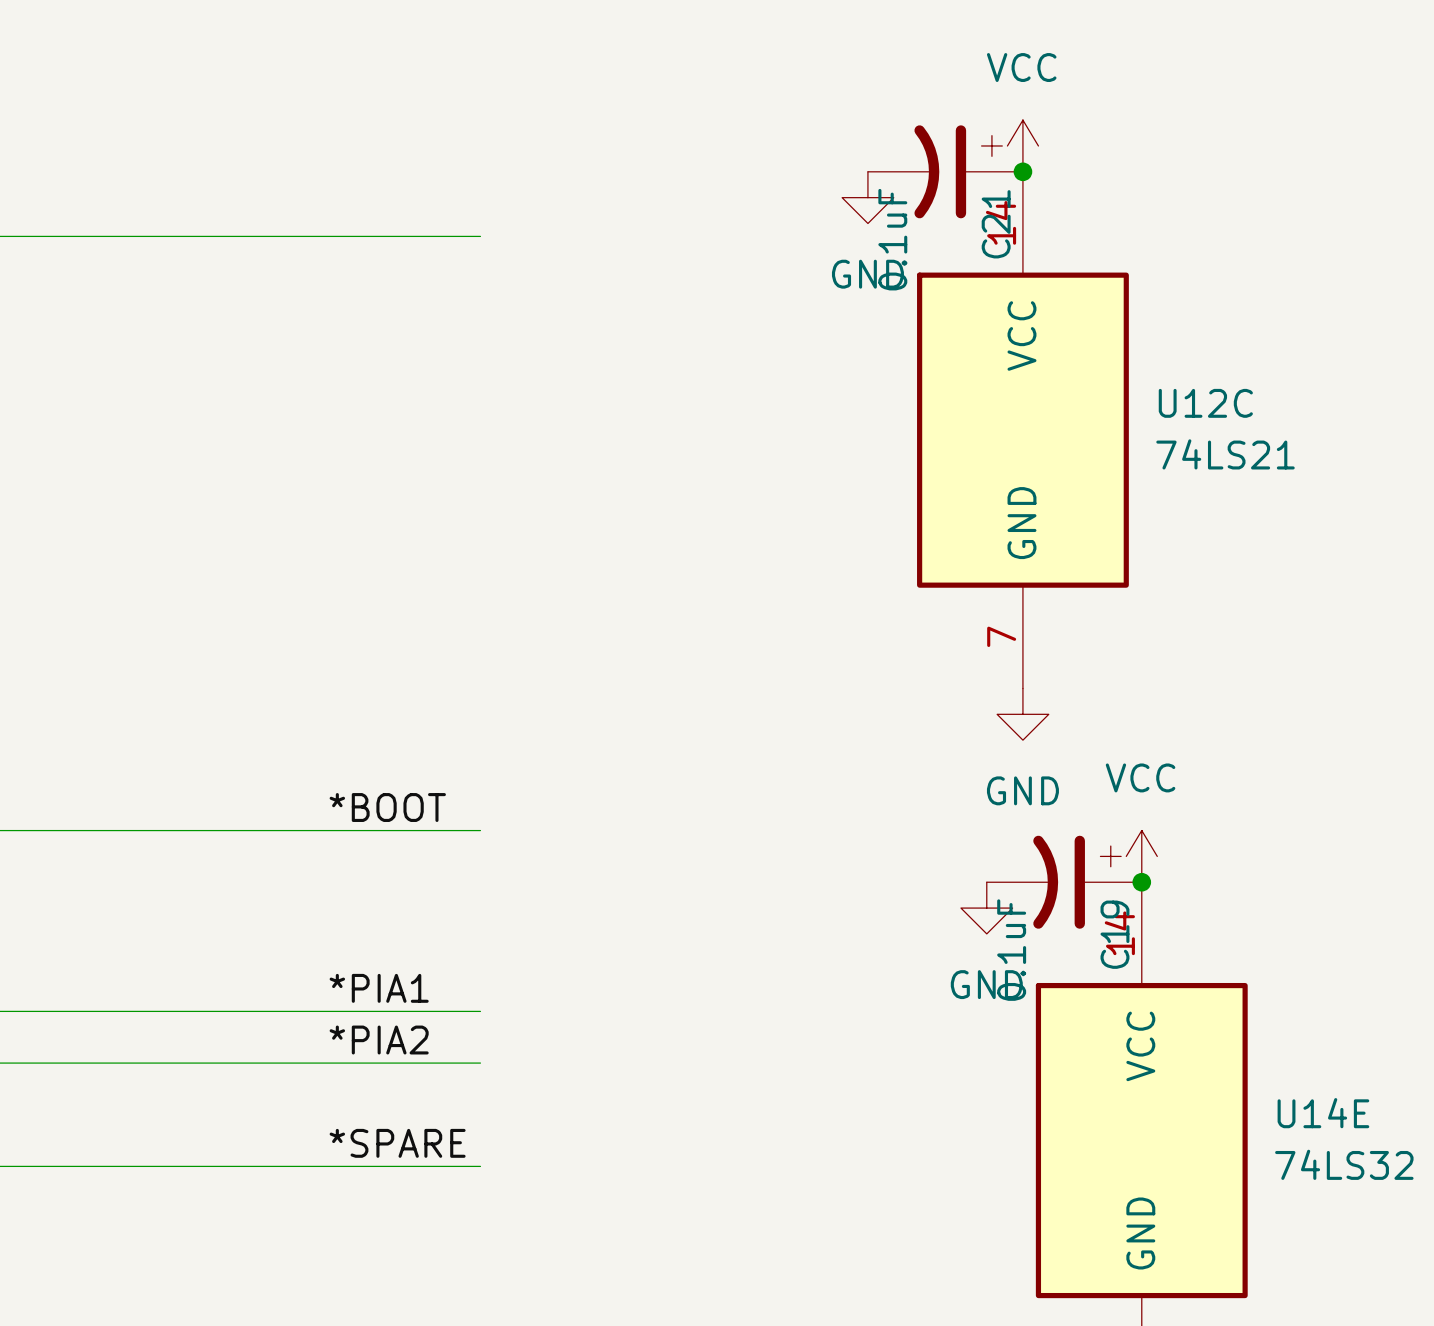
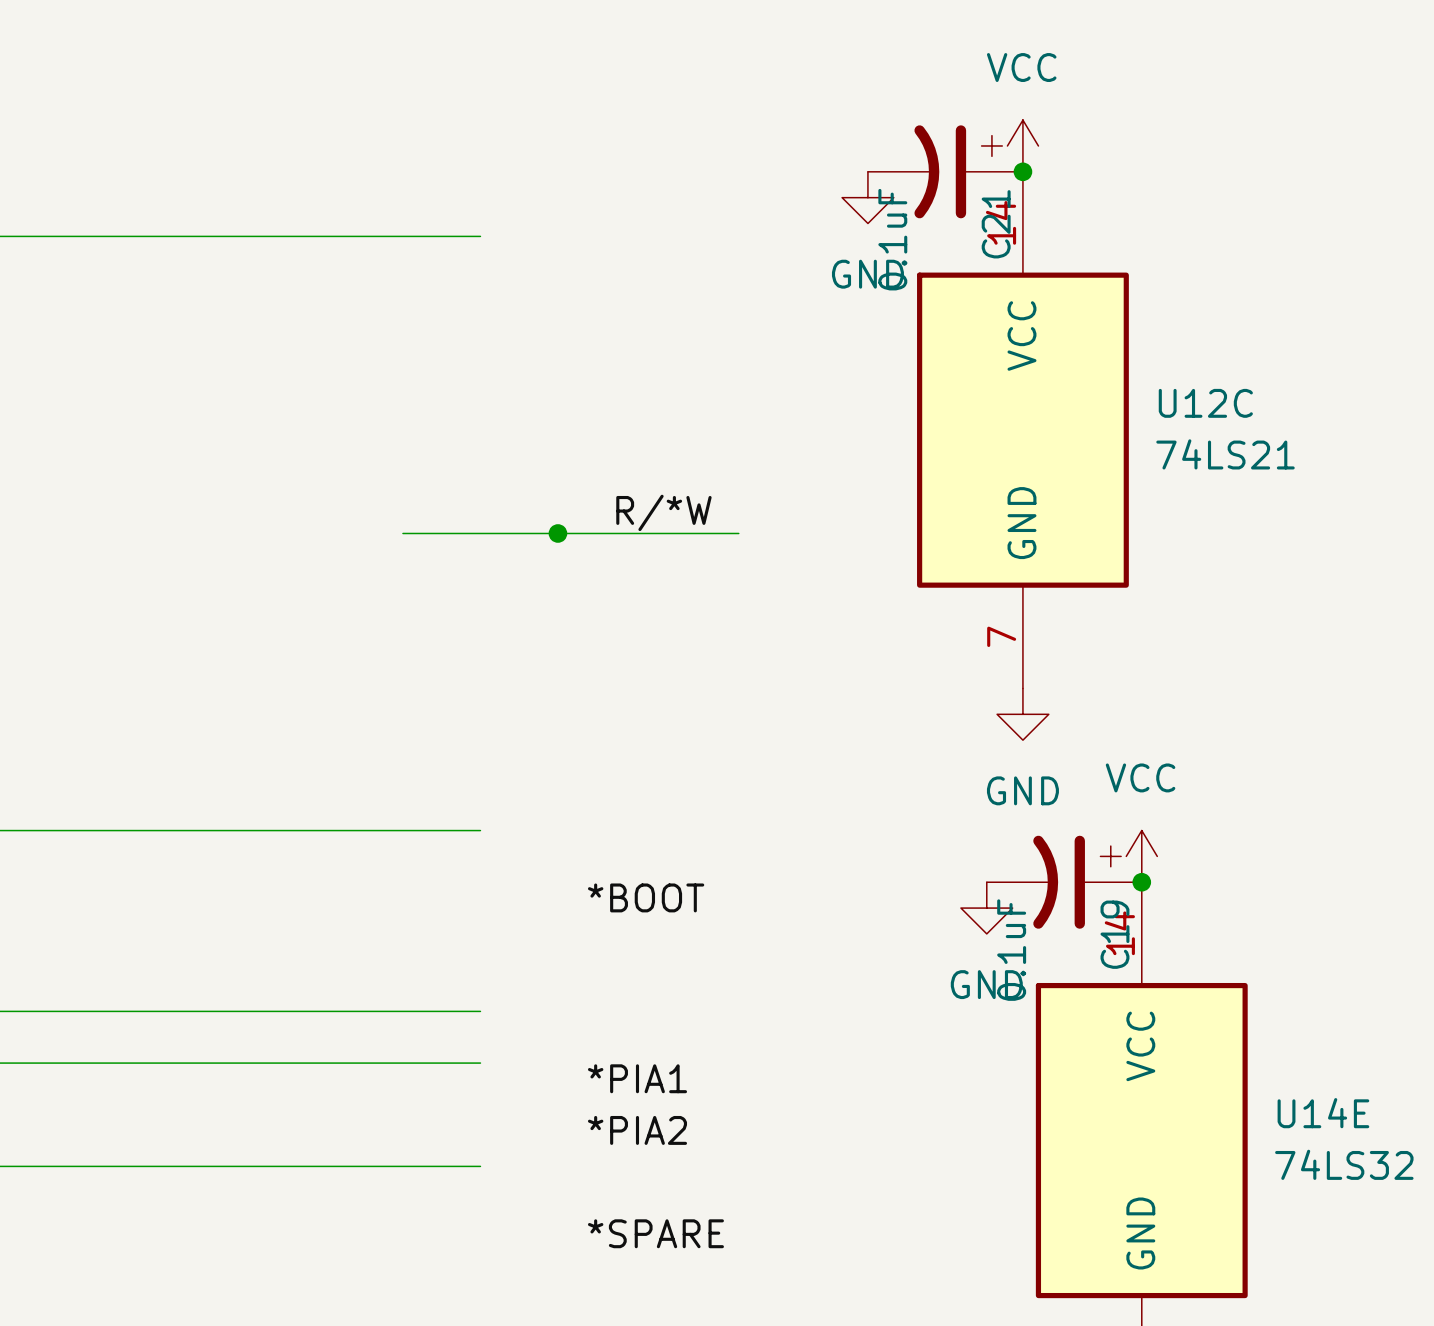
label: none -> R/*W (663, 512)
wire: none -> (402, 533) (738, 533)
junction: none -> (557, 533)
label position: *BOOT (387, 807) -> *BOOT (646, 897)
label position: *PIA1 (379, 988) -> *PIA1 (637, 1078)
label position: *PIA2 (379, 1040) -> *PIA2 (637, 1130)
label position: *SPARE (397, 1143) -> *SPARE (655, 1233)

